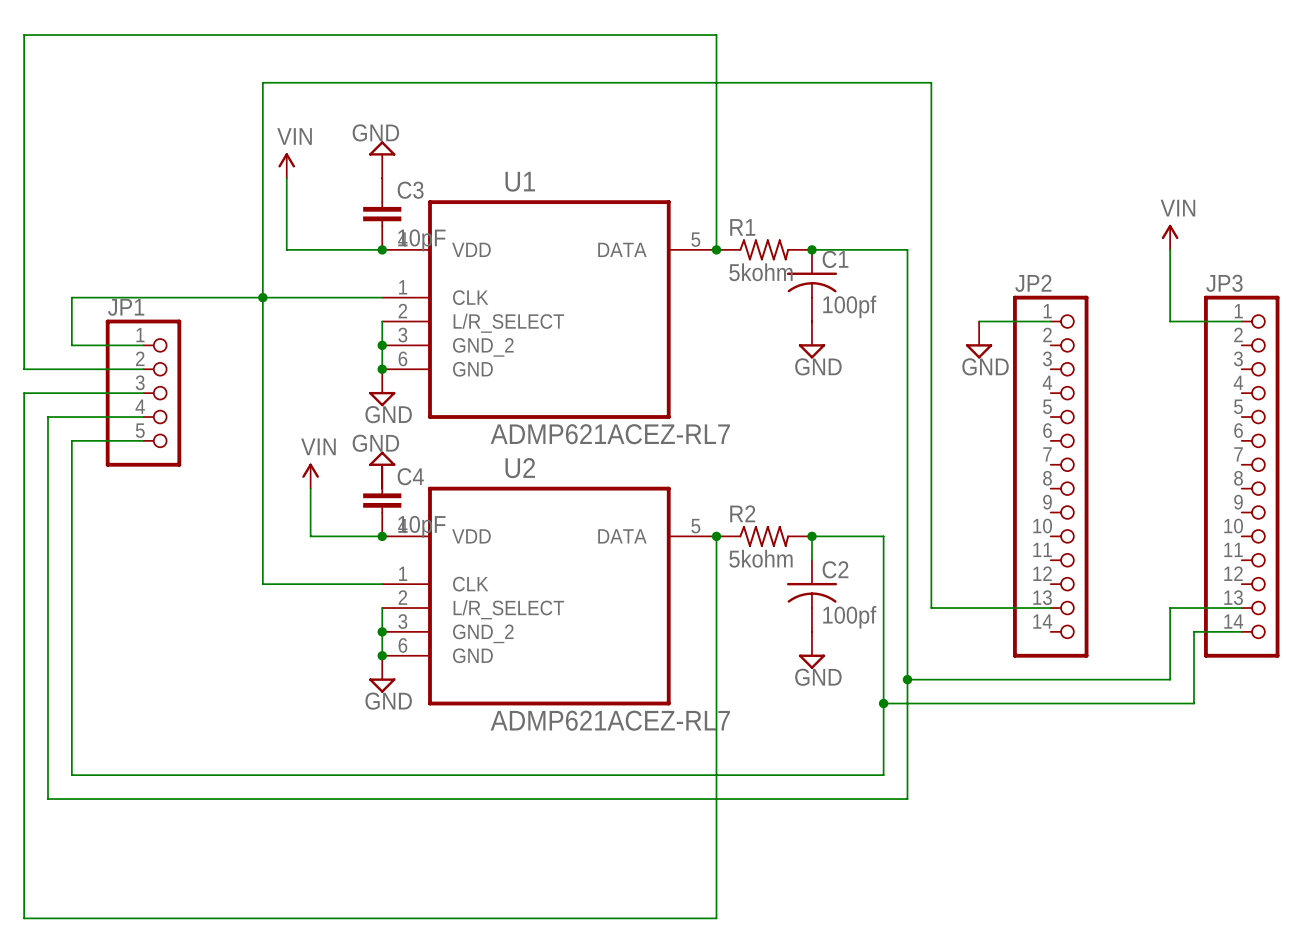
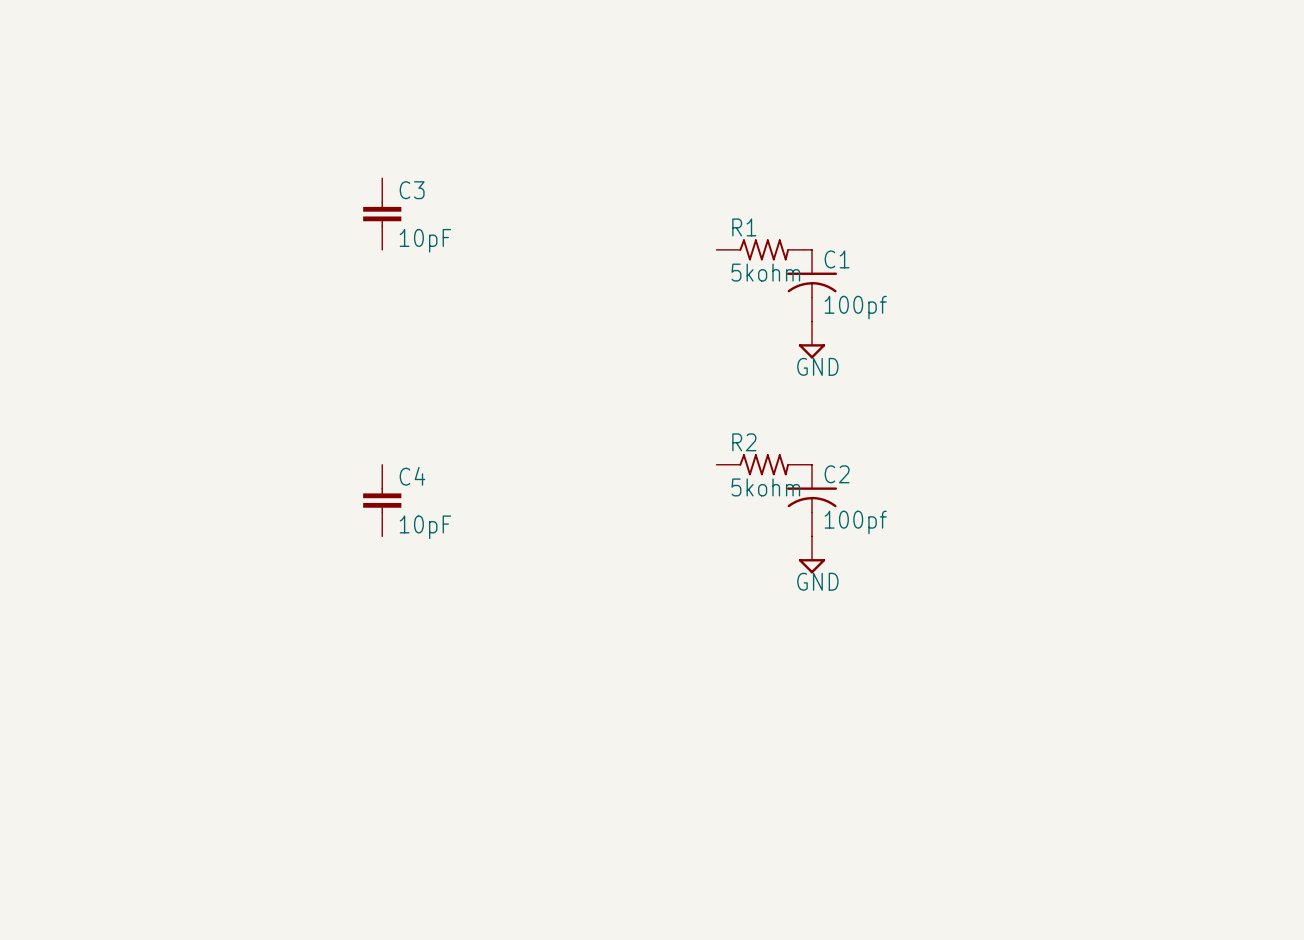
power symbol: GND (382, 159) -> none
power symbol: VIN (286, 165) -> none
wire: (286, 178) (286, 249) (382, 249) -> none
power symbol: VIN (1170, 237) -> none
junction: (382, 249) -> none
wire: (716, 249) (716, 35) (24, 35) (24, 369) (143, 369) -> none
junction: (716, 249) -> none
wire: (811, 249) (907, 249) (907, 799) (47, 799) (47, 417) (143, 417) -> none
junction: (811, 249) -> none
wire: (1170, 249) (1170, 321) (1241, 321) -> none
junction: (262, 297) -> none
wire: (382, 297) (71, 297) (71, 345) (143, 345) -> none
U1: ADMP621ACEZ-RL7 (549, 309) -> none
wire: (382, 321) (382, 369) -> none
wire: (979, 321) (1050, 321) -> none
power symbol: GND (979, 340) -> none
junction: (382, 345) -> none
junction: (382, 369) -> none
power symbol: GND (382, 387) -> none
wire: (143, 393) (24, 393) (24, 918) (716, 918) (716, 536) -> none
JP1: (143, 393) -> none
wire: (143, 440) (71, 440) (71, 775) (883, 775) (883, 536) (811, 536) (811, 560) -> none
power symbol: GND (382, 470) -> none
power symbol: VIN (310, 476) -> none
JP2: (1050, 476) -> none
JP3: (1241, 476) -> none
wire: (310, 488) (310, 536) (382, 536) -> none
junction: (382, 536) -> none
junction: (716, 536) -> none
R2 position: (764, 536) -> (764, 464)
junction: (811, 536) -> none
wire: (382, 584) (262, 584) (262, 82) (931, 82) (931, 608) (1050, 608) -> none
U2: ADMP621ACEZ-RL7 (549, 596) -> none
C2 position: (811, 596) -> (811, 500)
wire: (382, 608) (382, 655) -> none
wire: (1241, 608) (1170, 608) (1170, 679) (907, 679) -> none
junction: (382, 631) -> none
wire: (1241, 631) (1193, 631) (1193, 703) (883, 703) -> none
power symbol position: GND (811, 650) -> GND (811, 554)
junction: (382, 655) -> none
power symbol: GND (382, 674) -> none
junction: (907, 679) -> none
junction: (883, 703) -> none

